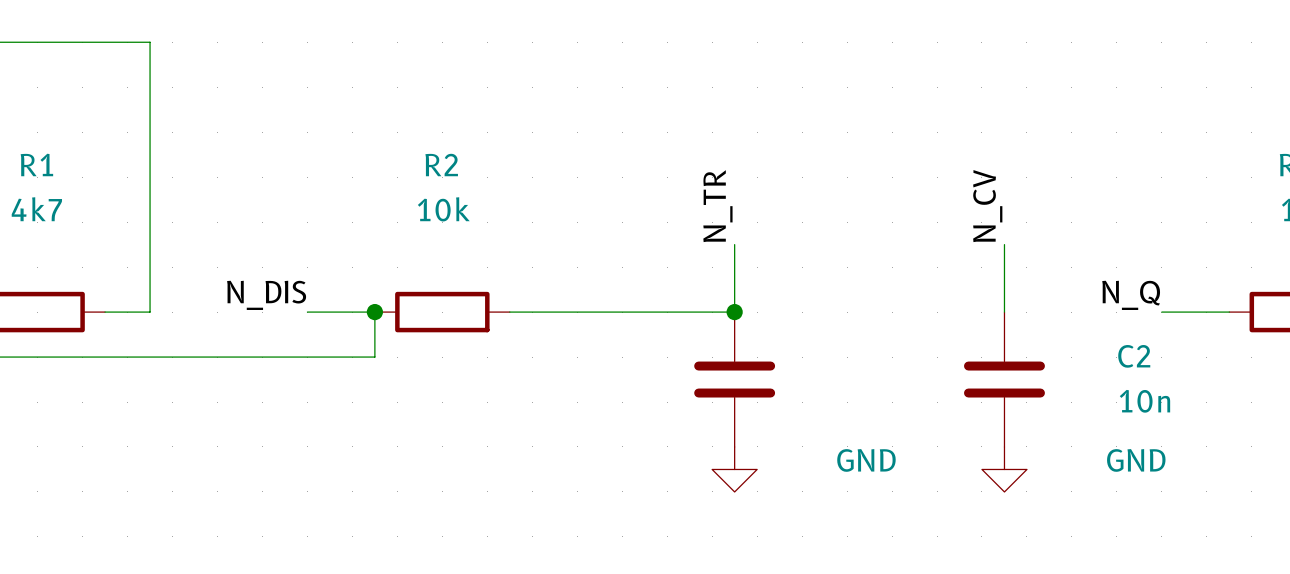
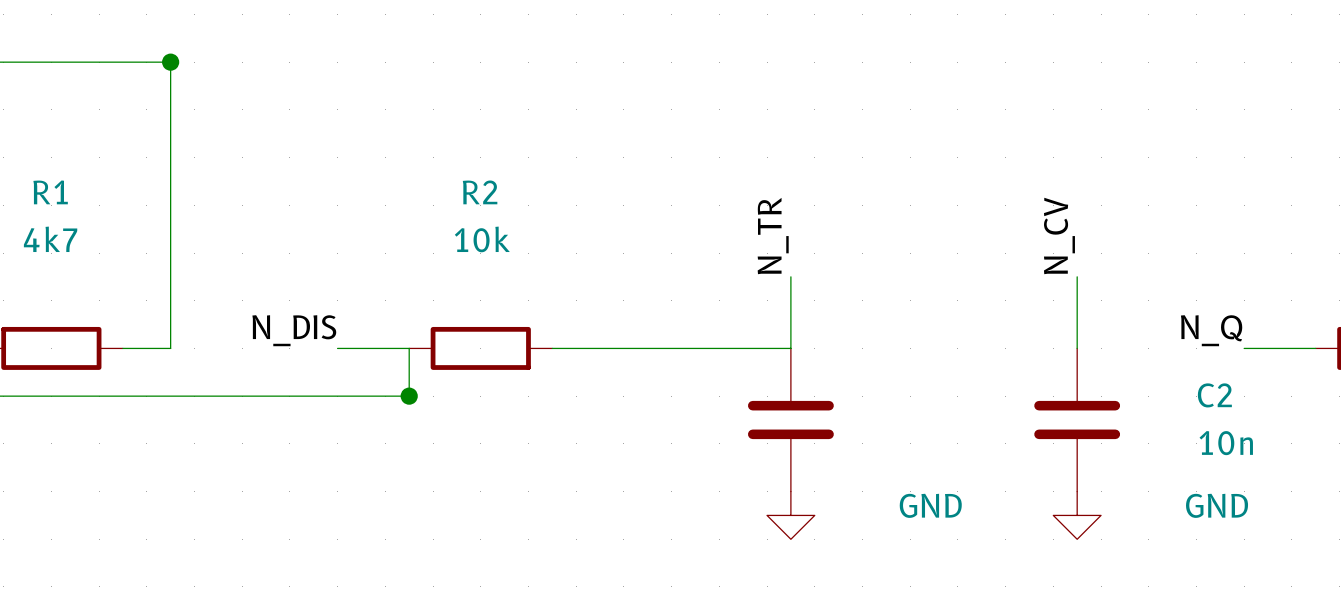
junction: none -> (170, 62)
junction position: (374, 312) -> (409, 396)
junction: (734, 312) -> none

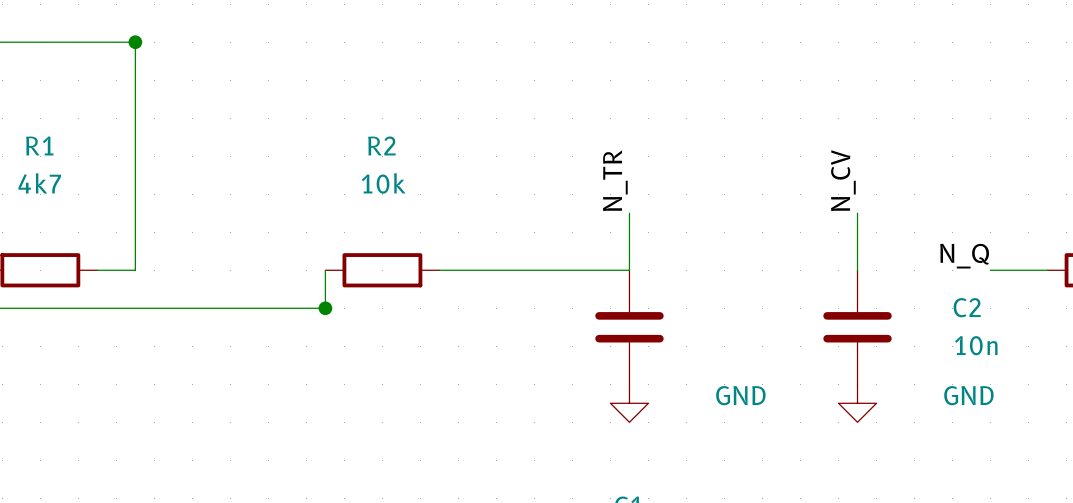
label: N_DIS (294, 330) -> none
wire: (337, 348) (409, 348) -> none

